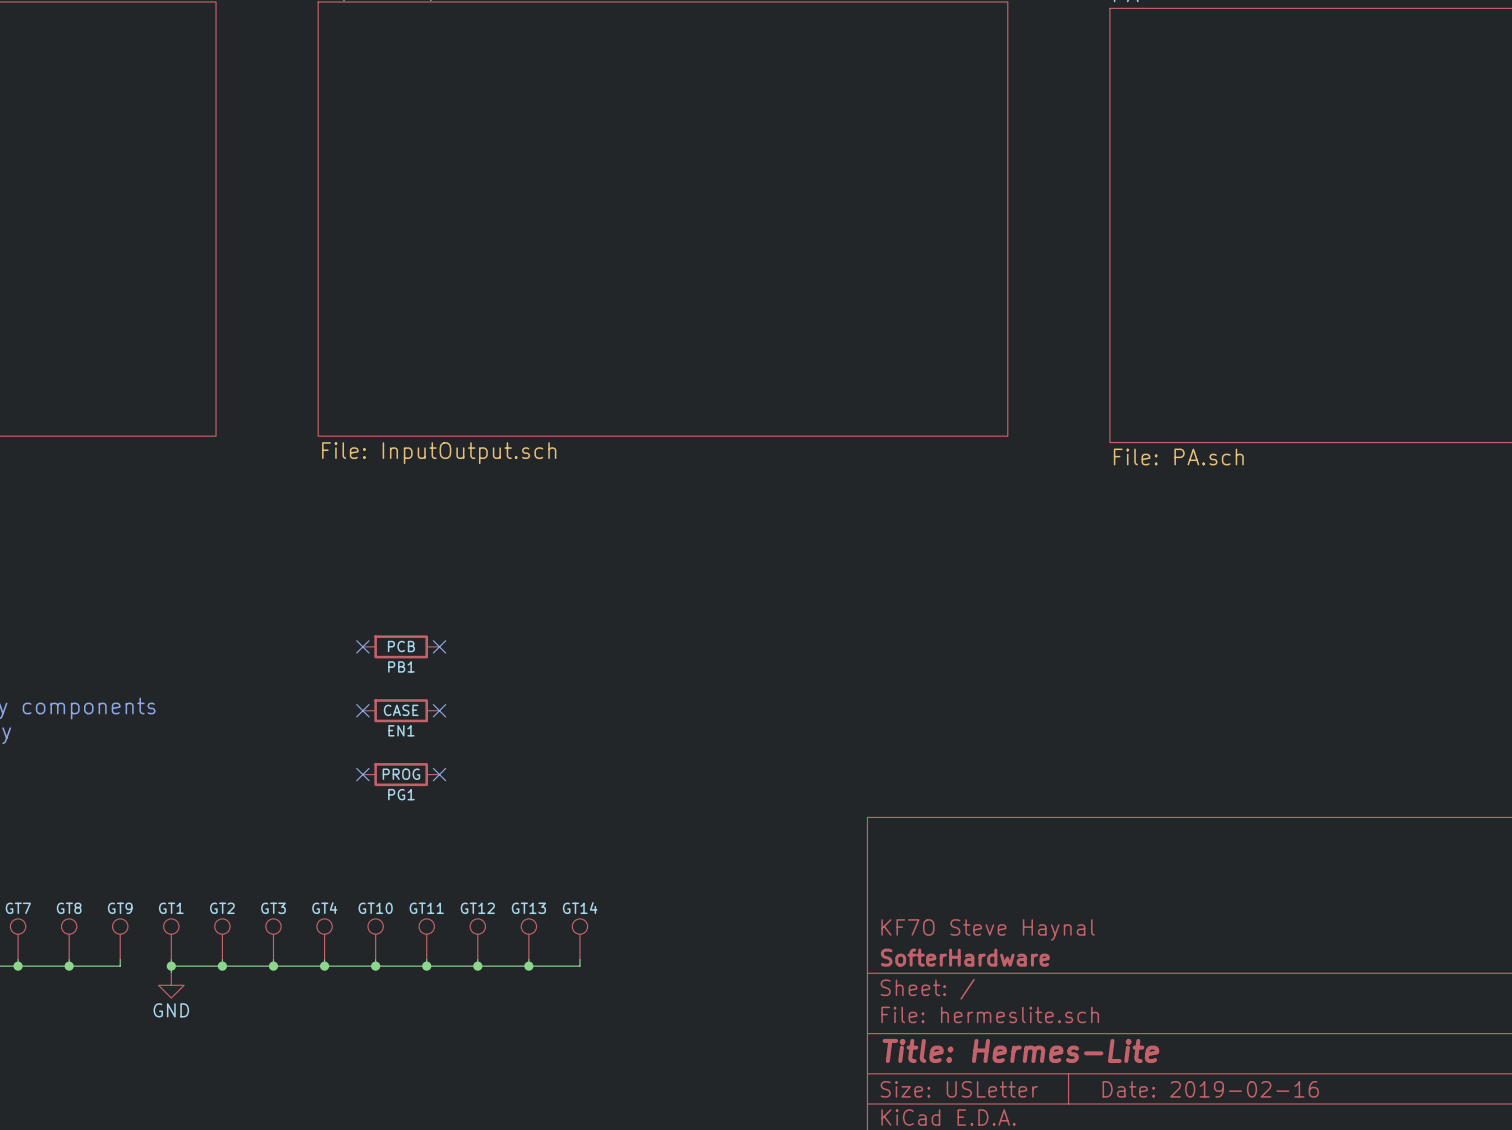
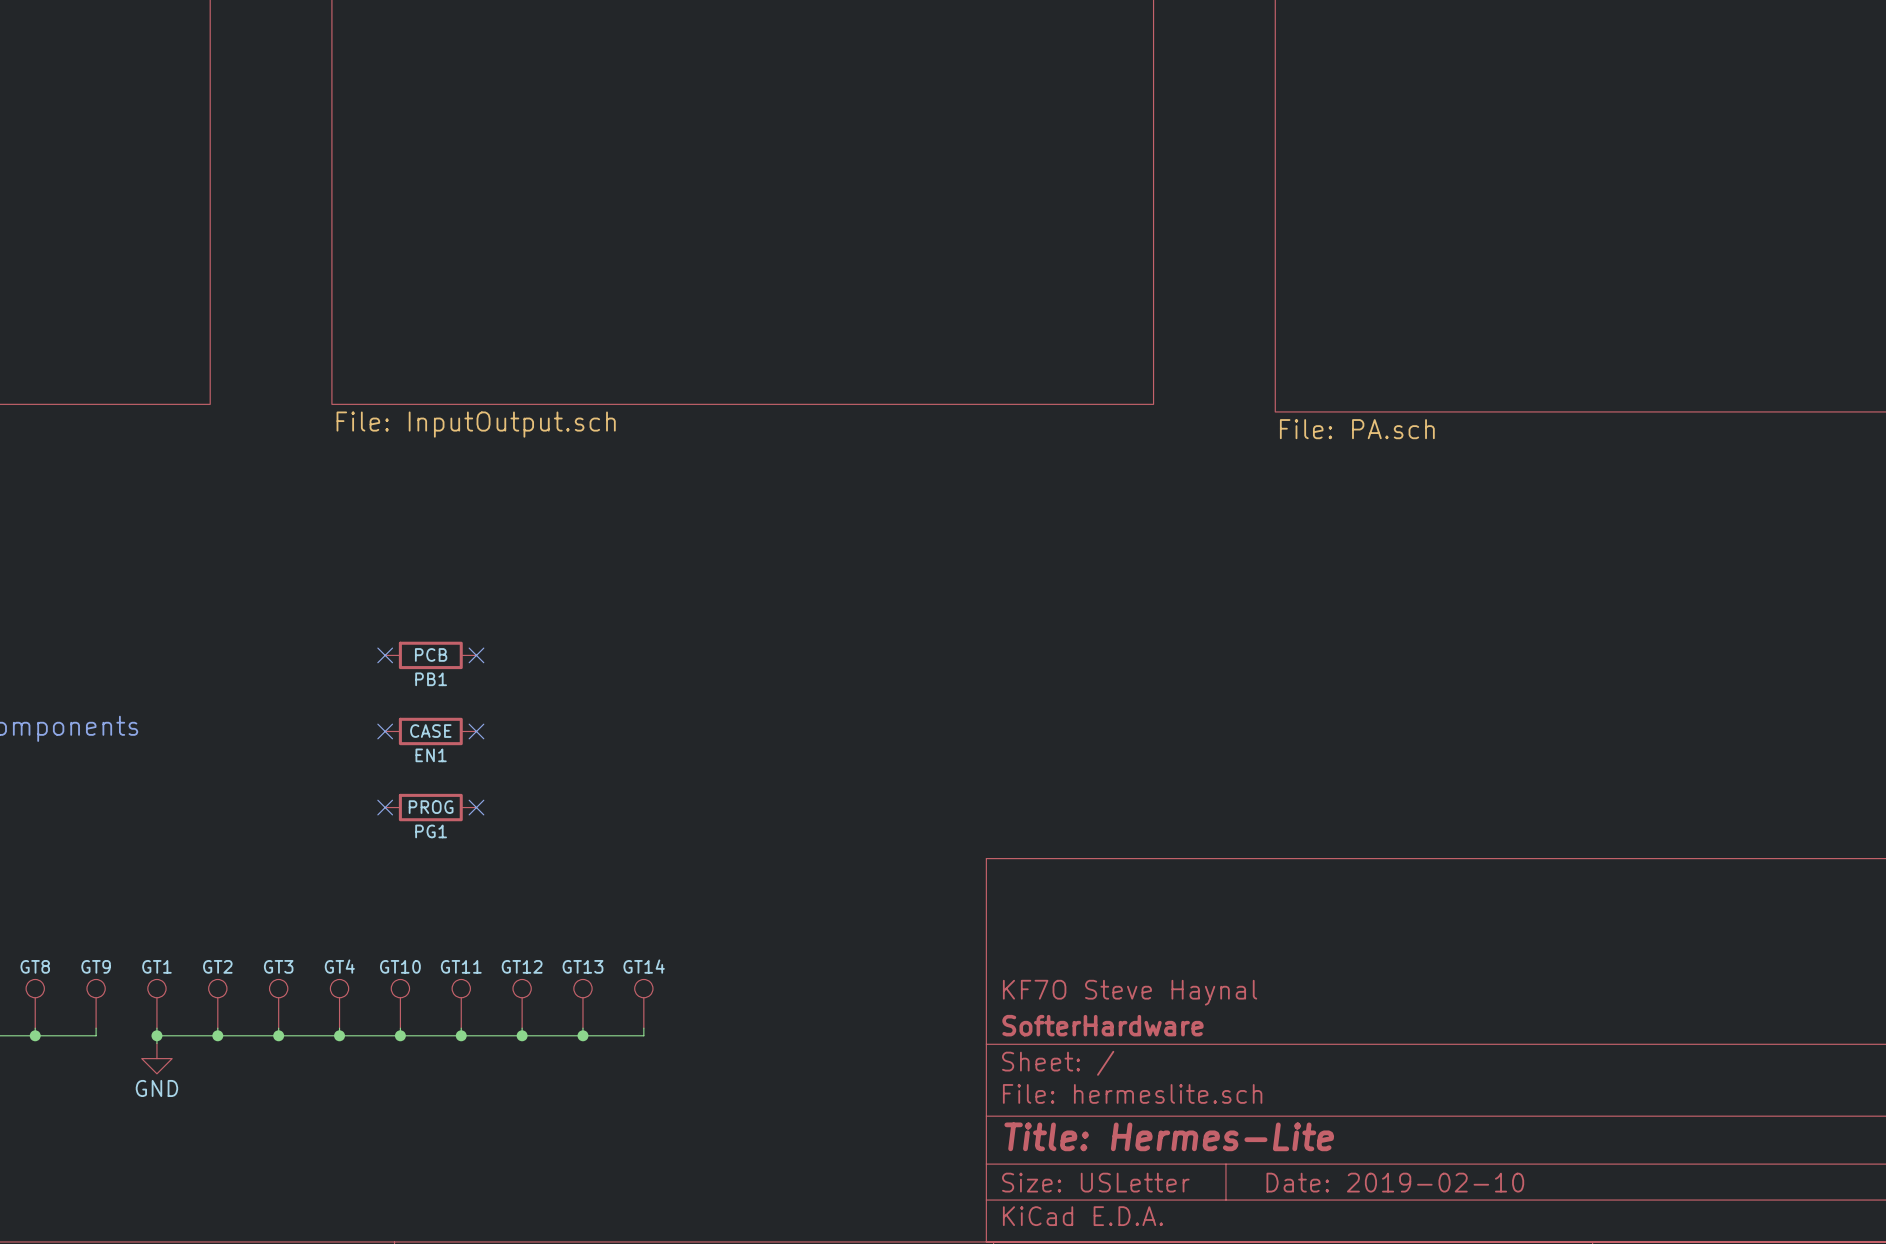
title block: Date: 2019-02-16 (1210, 1089) -> Date: 2019-02-10 (1395, 1182)

